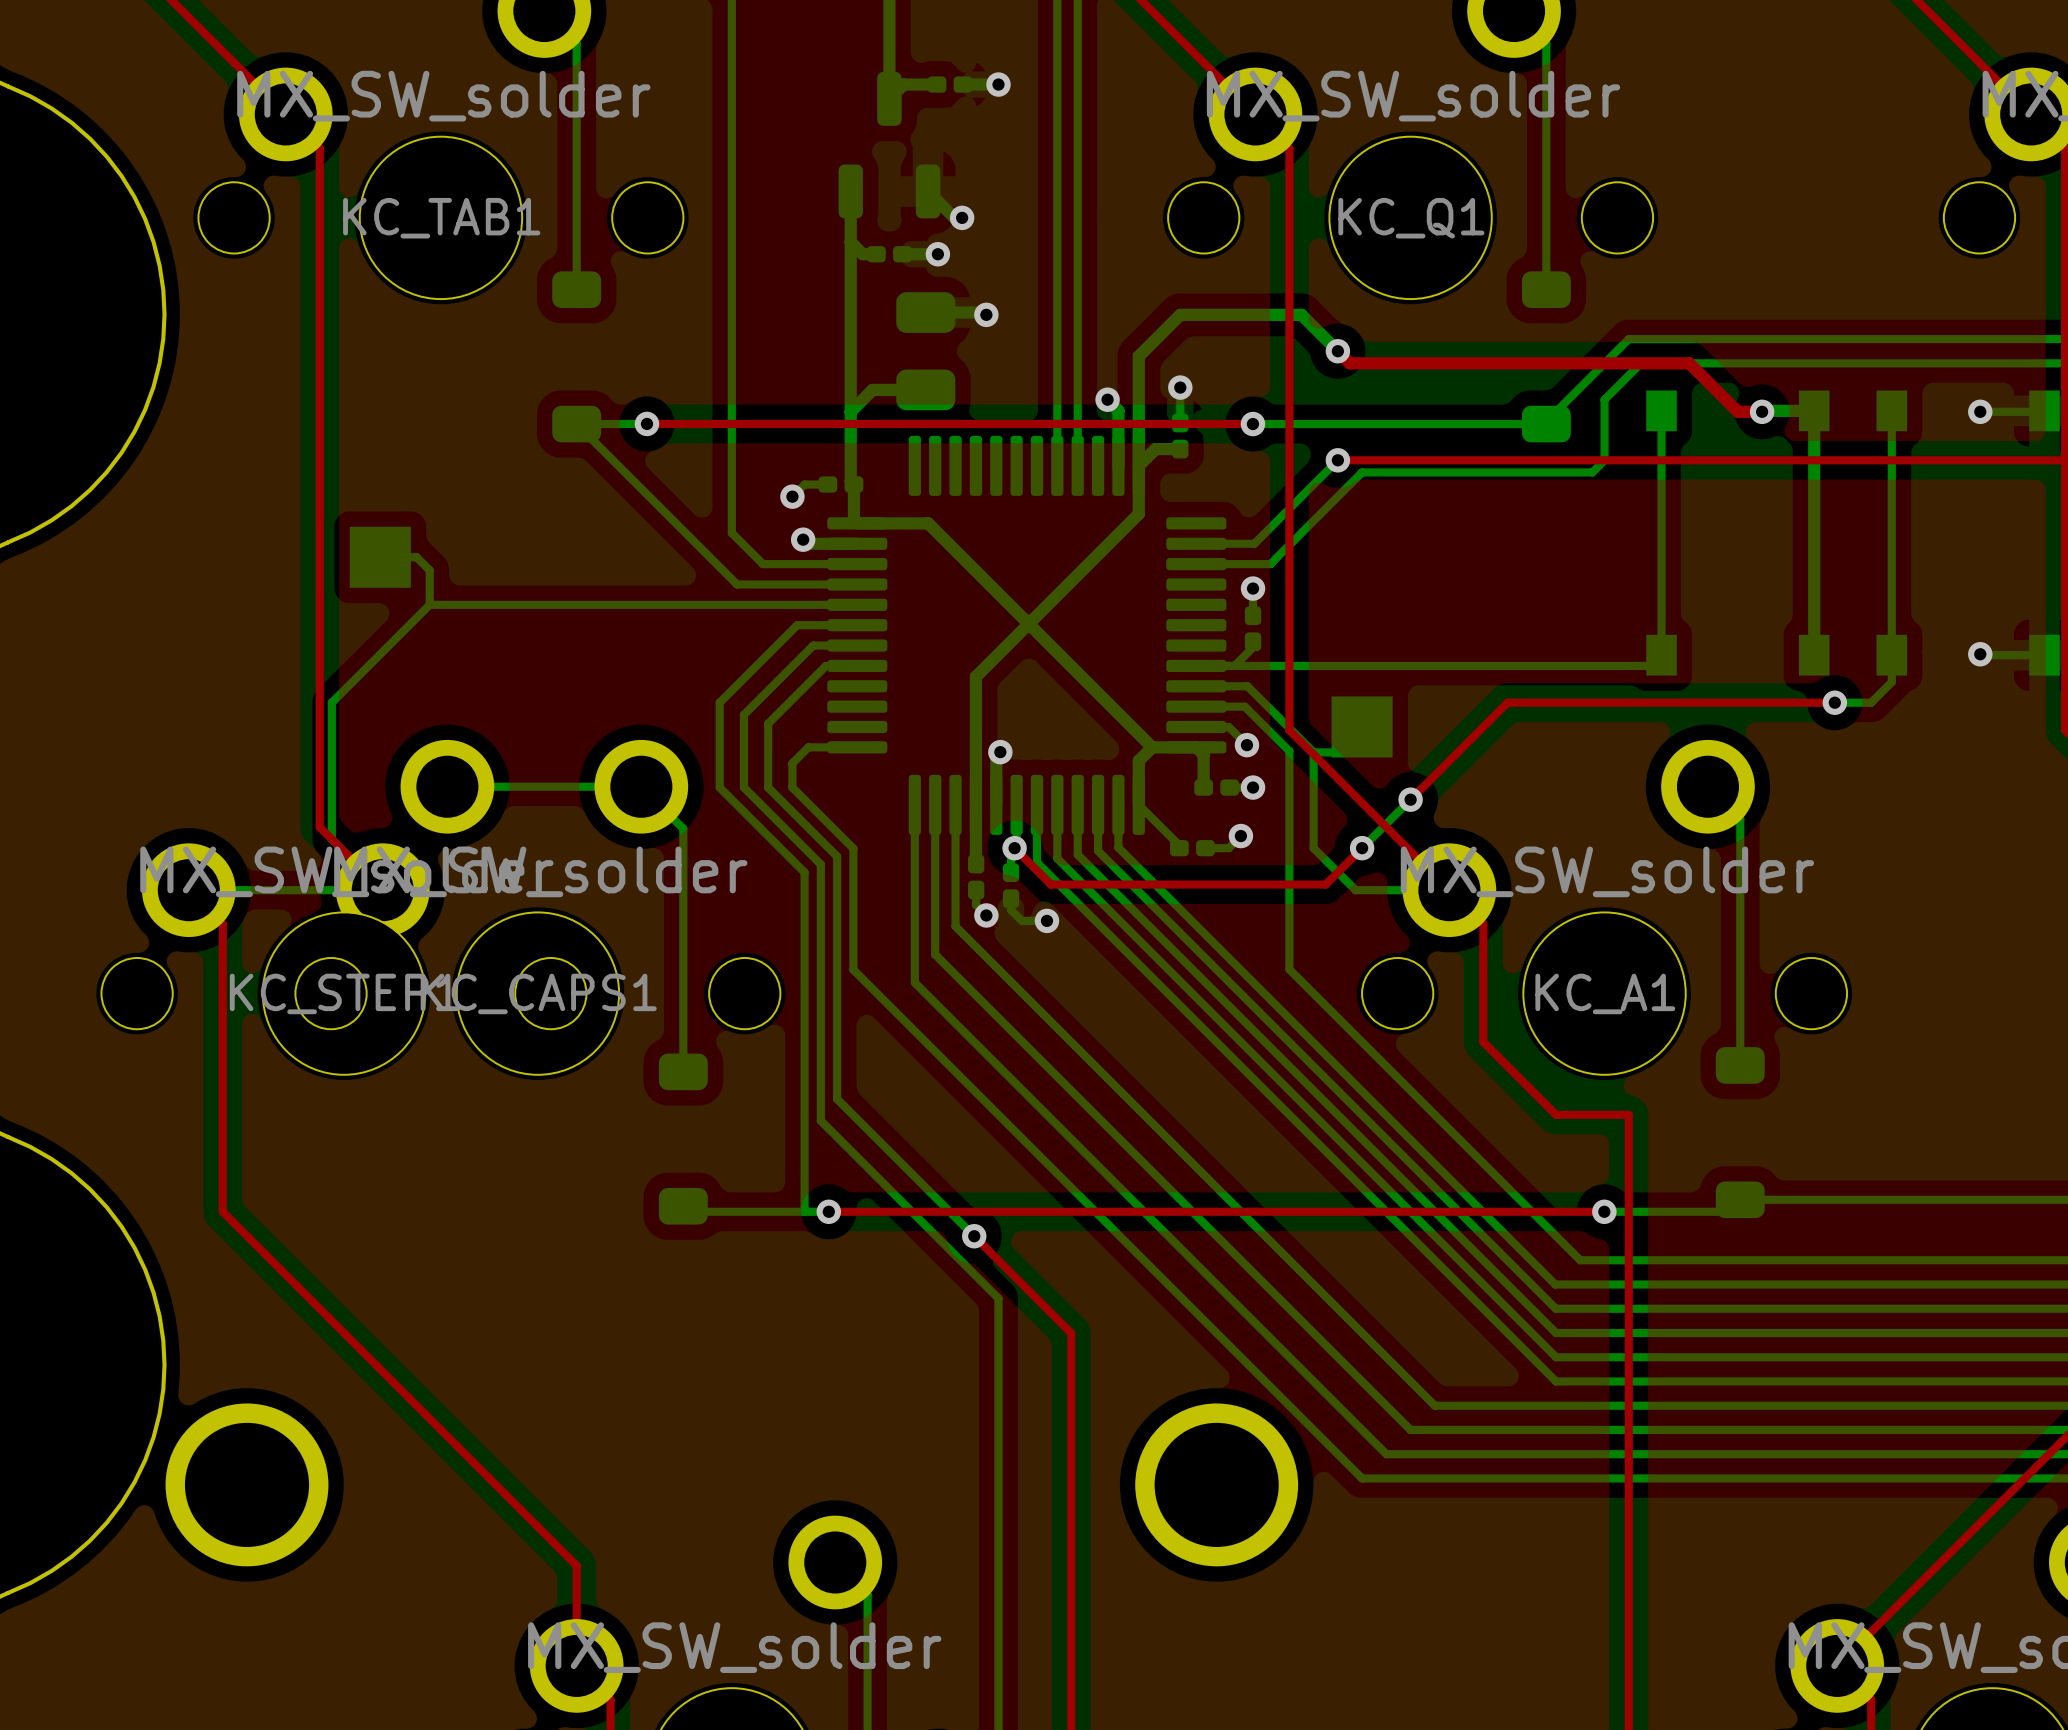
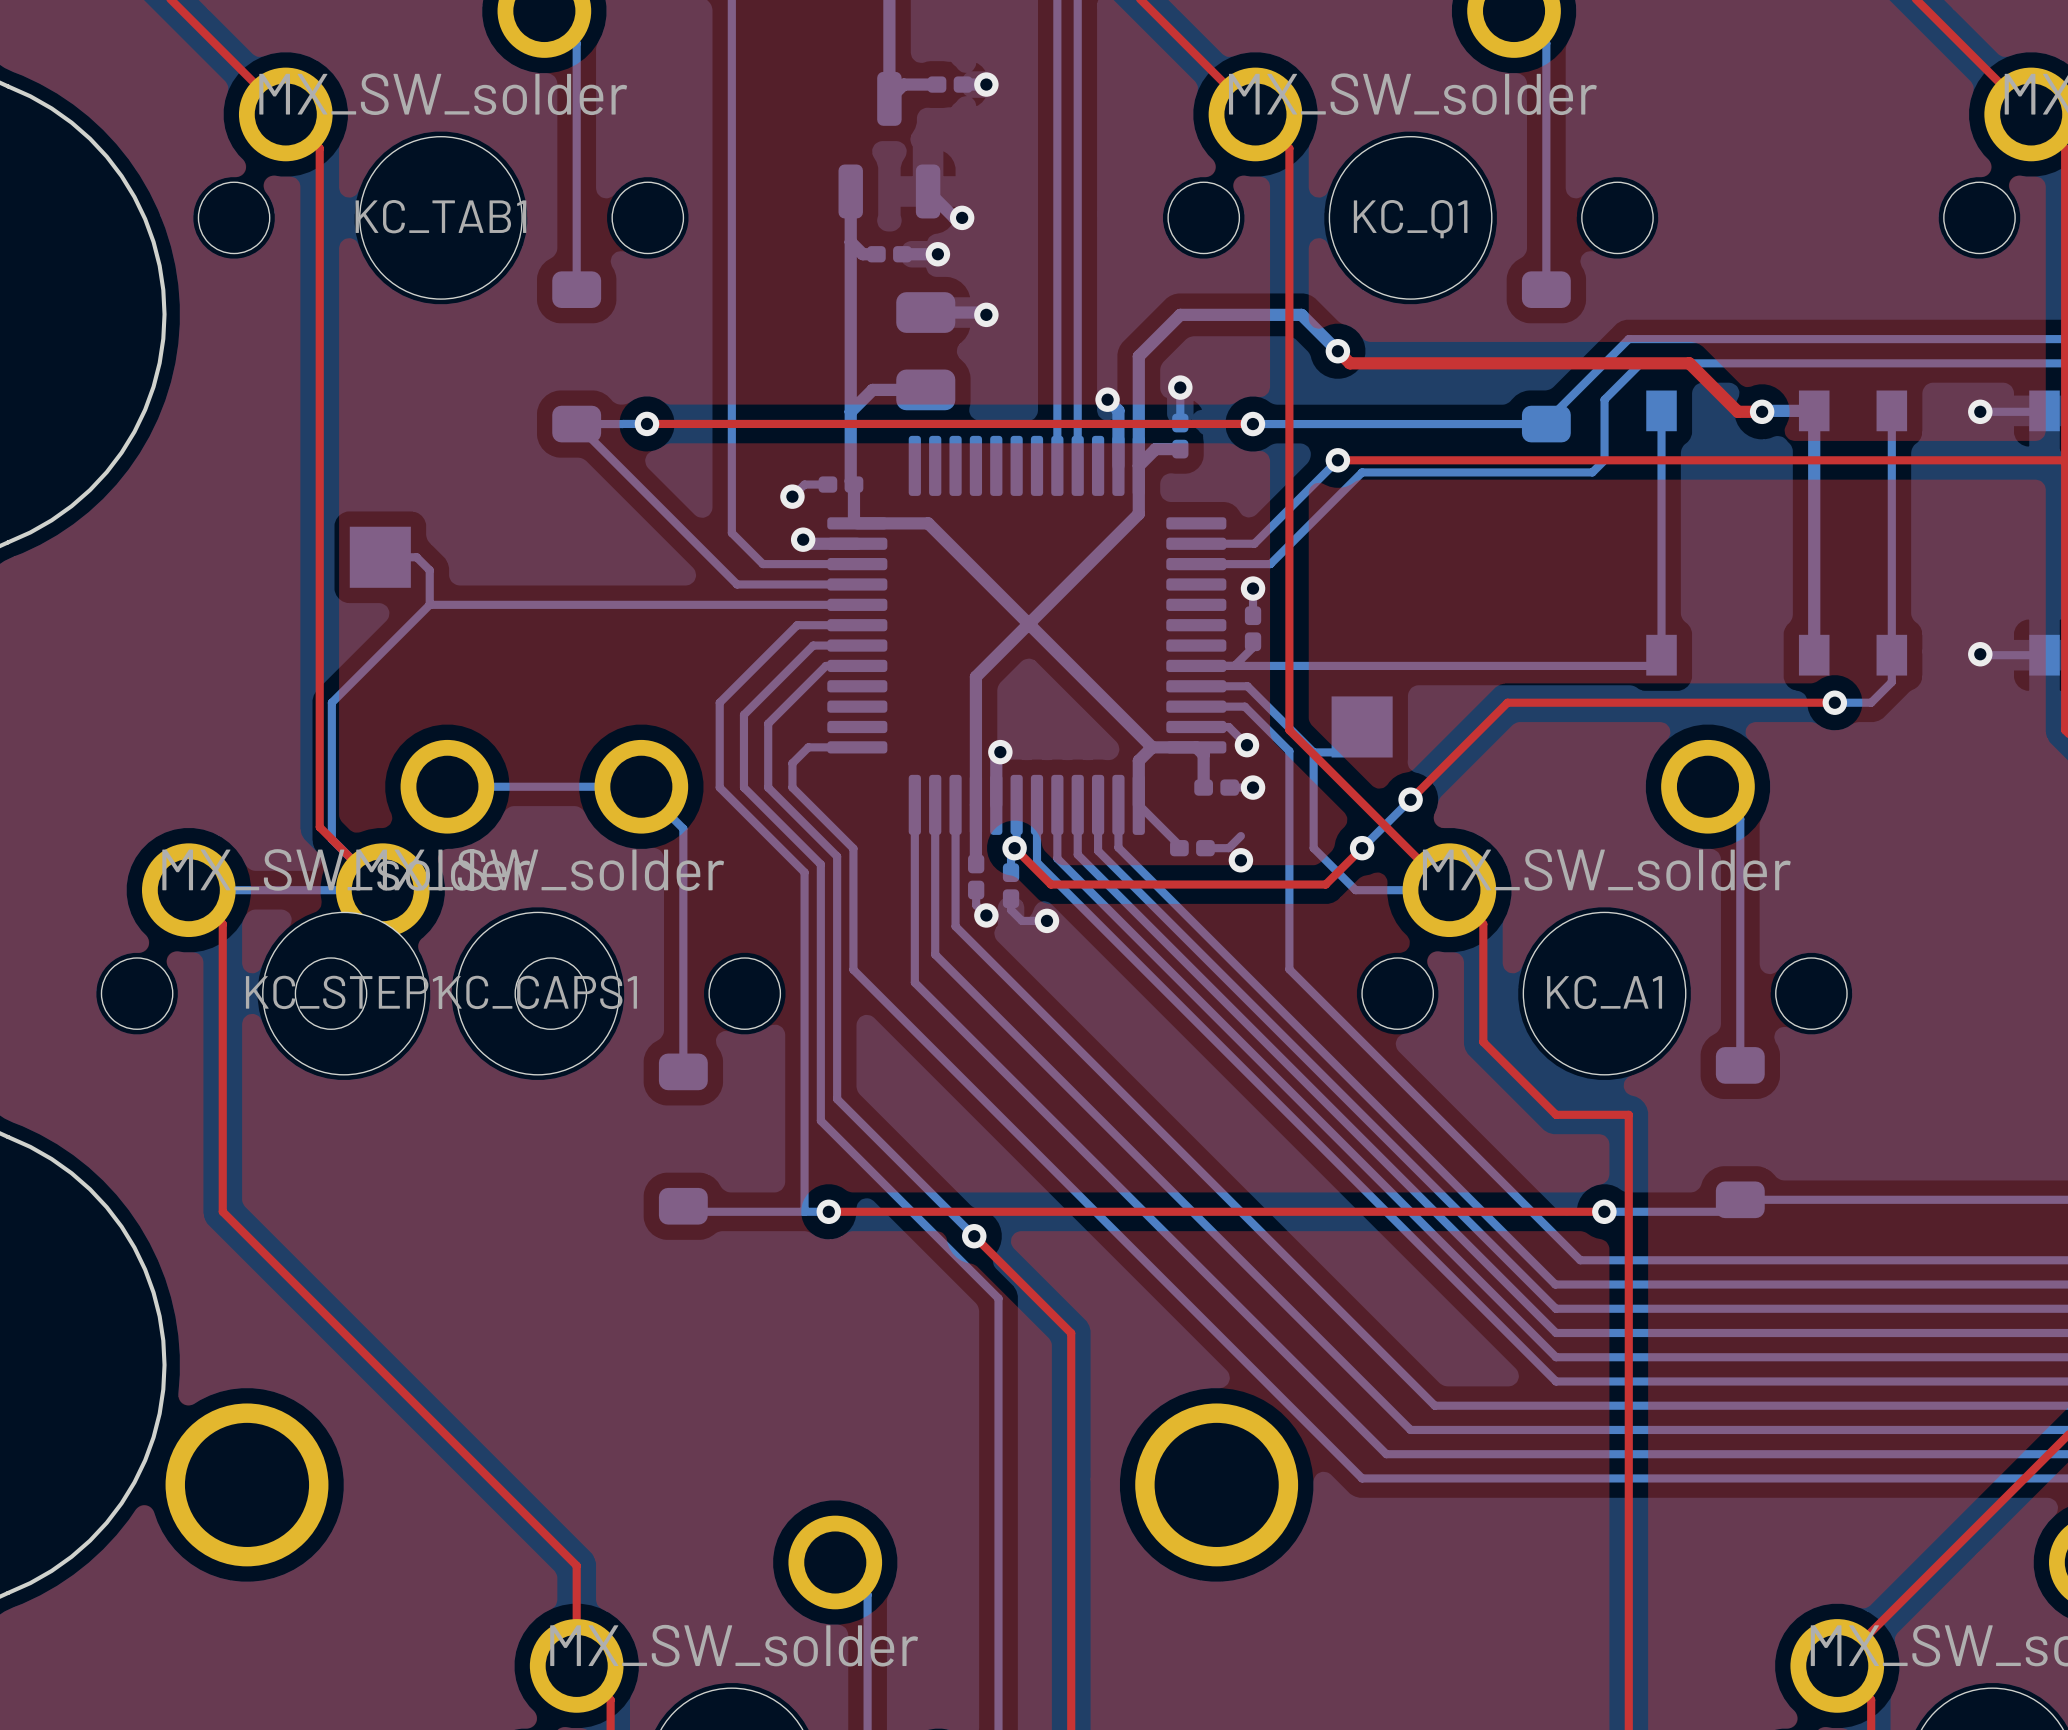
via position: (998, 84) -> (986, 84)
via position: (1240, 836) -> (1240, 860)

